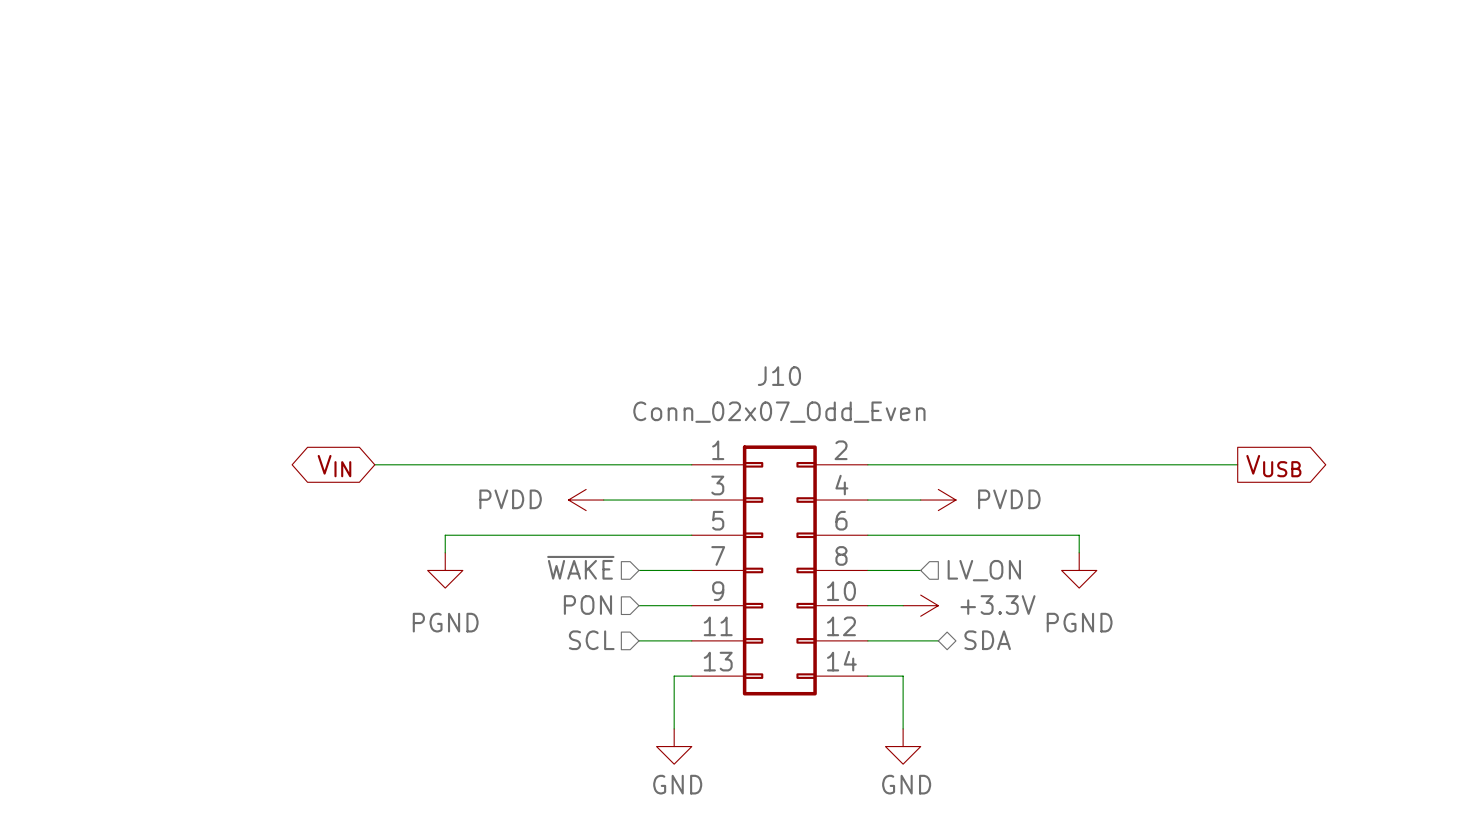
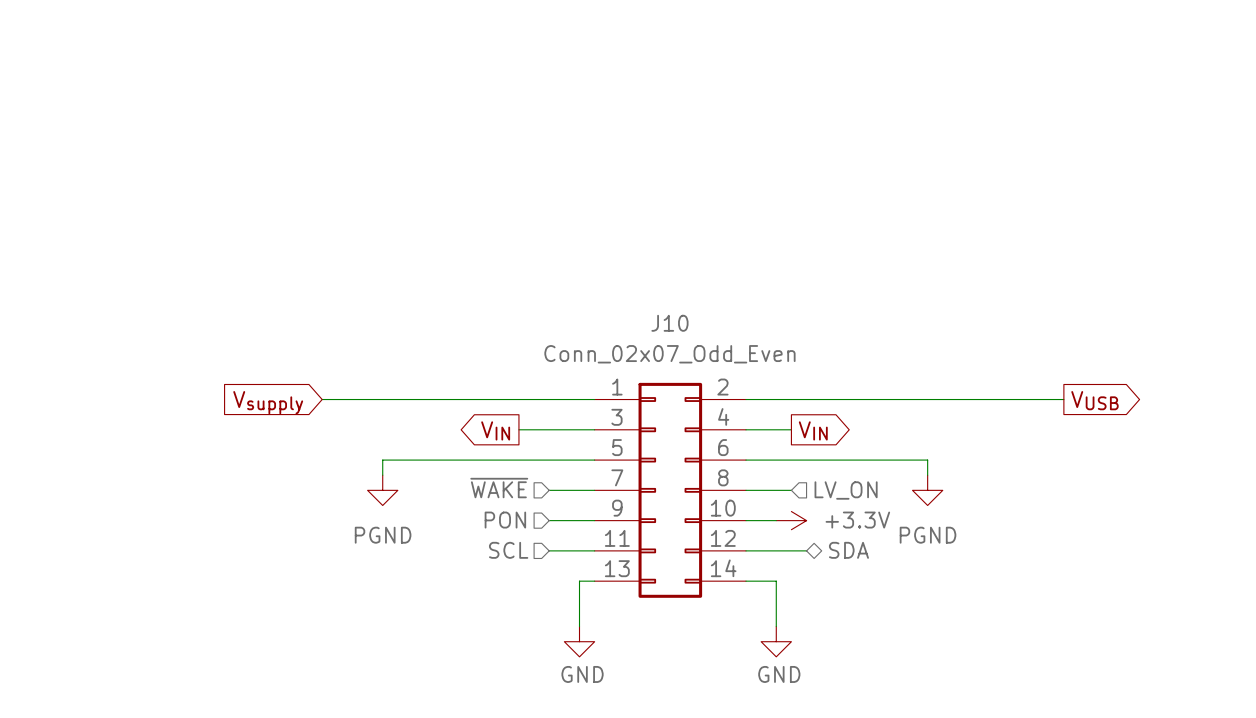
global label shape: bidirectional (334, 466) -> input (268, 402)
global label: VIN (334, 466) -> Vsupply (268, 402)
power symbol: PVDD (586, 500) -> none
power symbol: PVDD (938, 500) -> none
global label: none -> VIN (495, 430)
global label: none -> VIN (813, 430)

